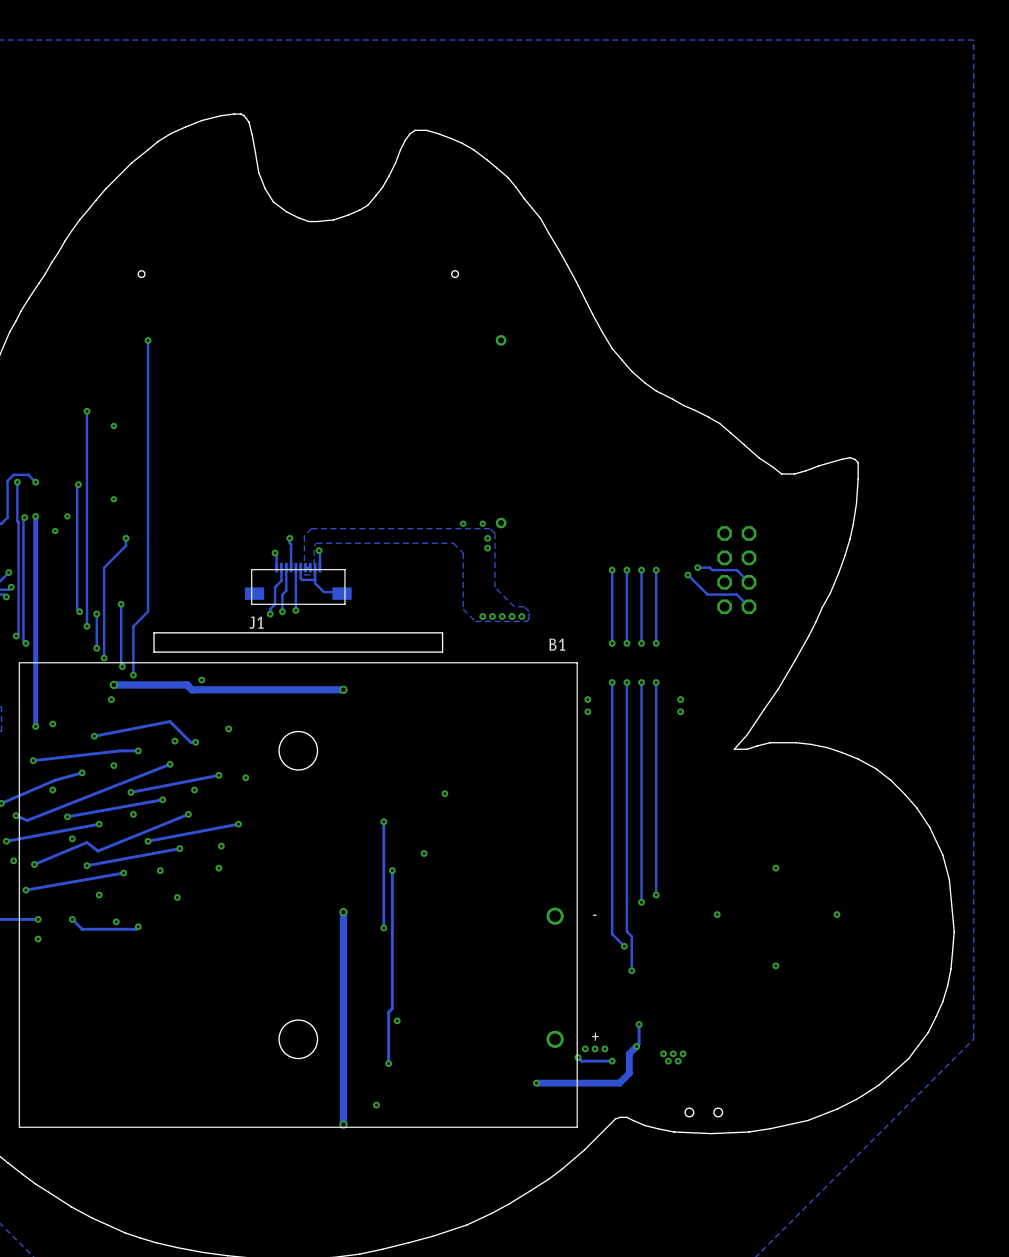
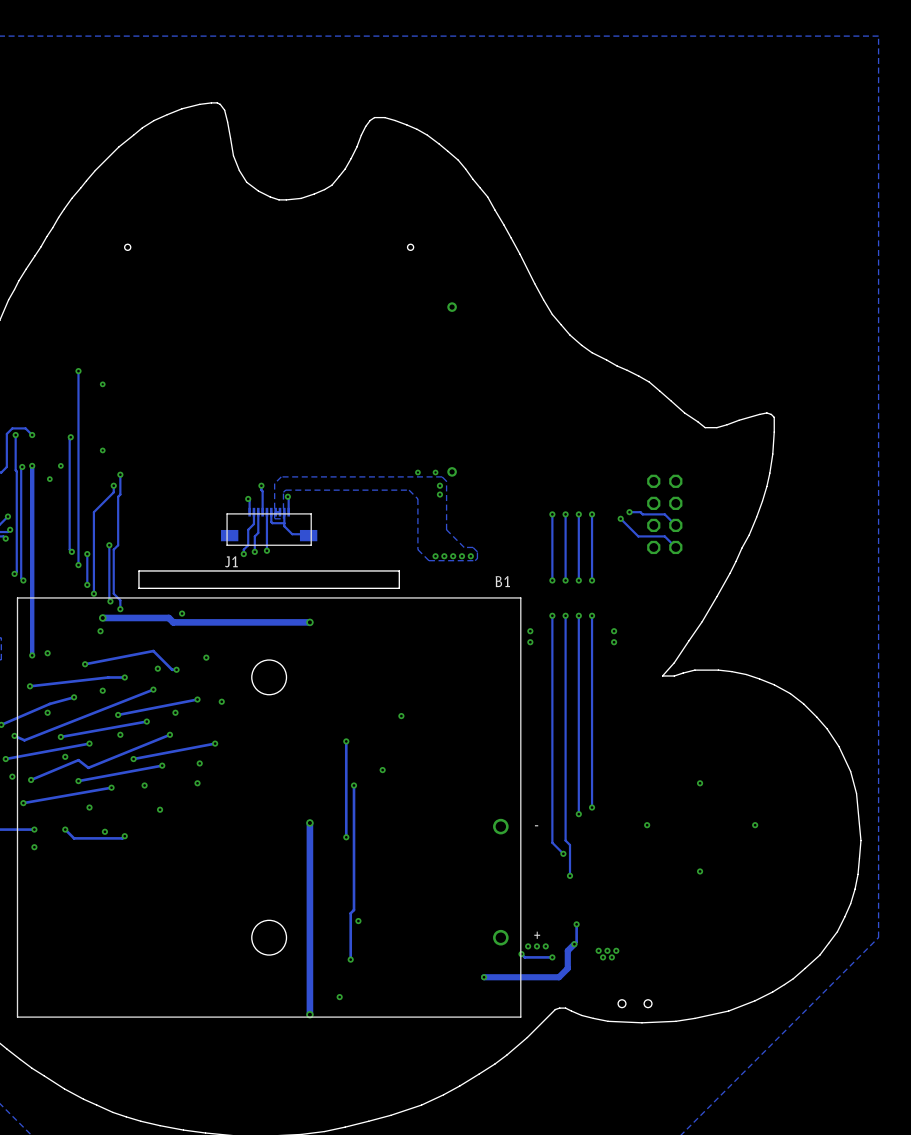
track: (148, 340) (148, 611) (133, 626) (133, 665) -> (120, 474) (120, 494) (118, 496) (118, 545) (113, 549) (113, 593) (120, 600)
via: (148, 340) -> none
via: none -> (120, 474)

